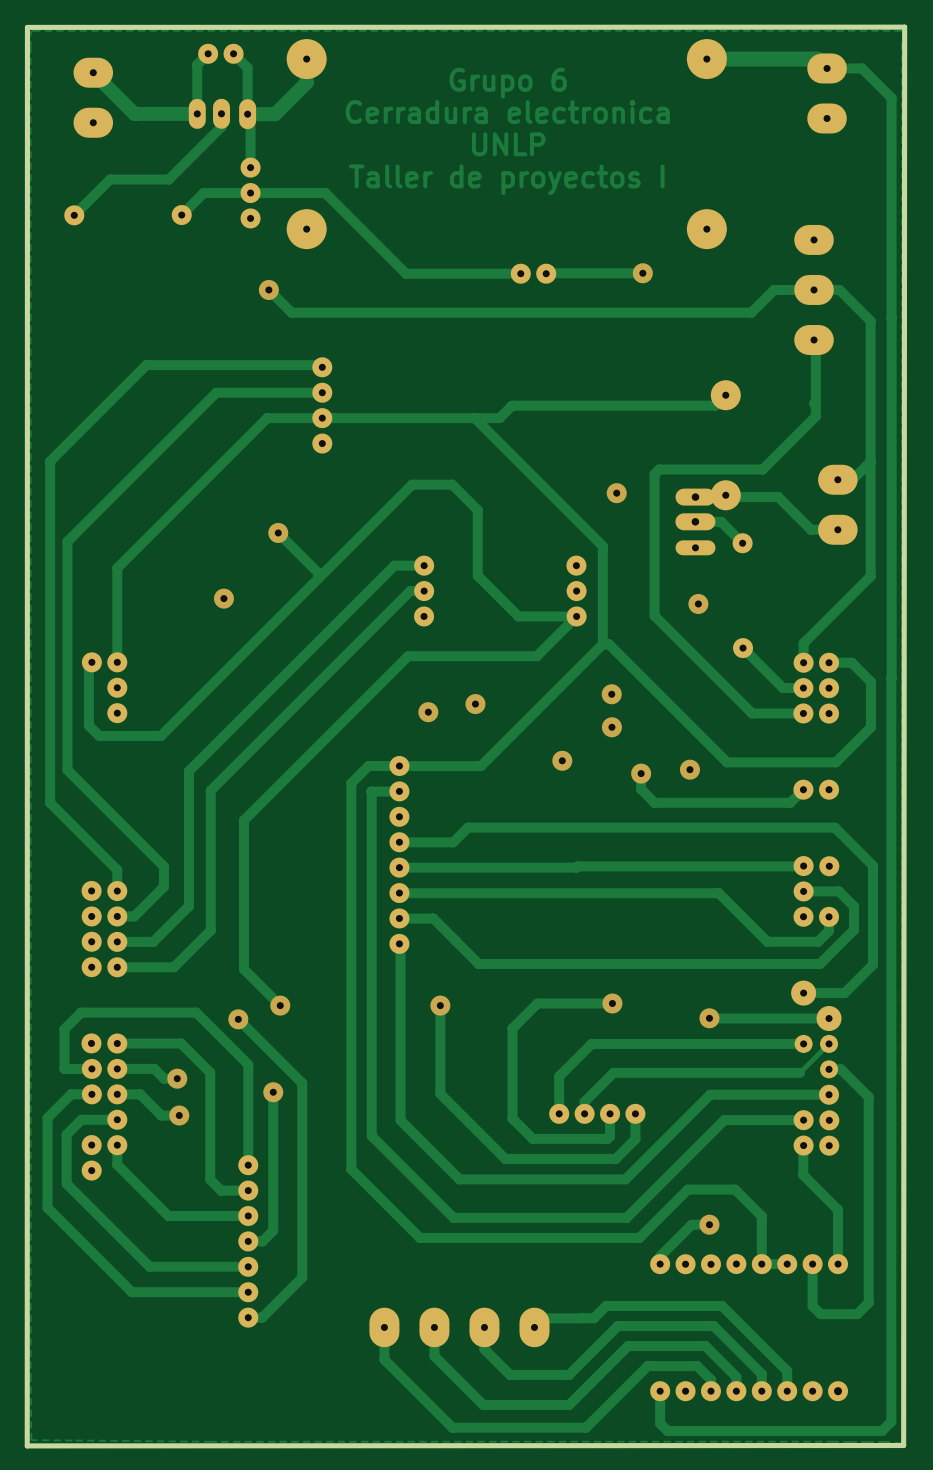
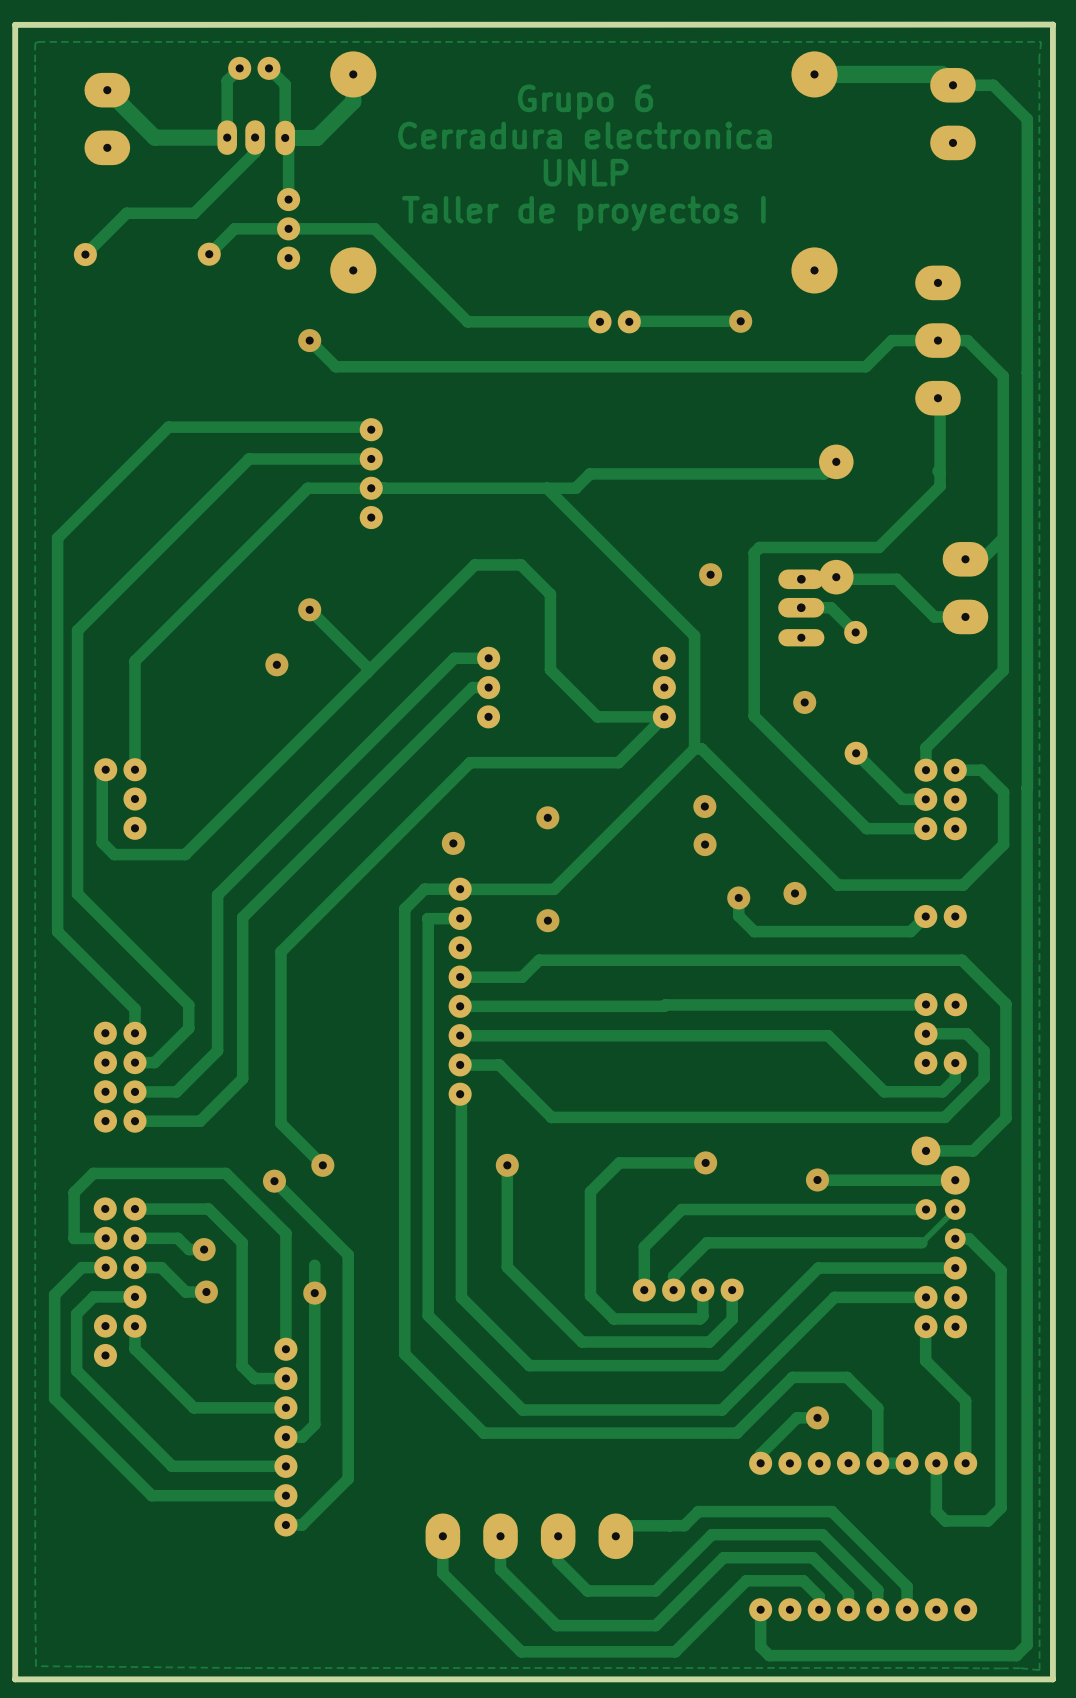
board edge: (904, 27) (903, 1445) (27, 1445) (27, 27) (904, 27) -> (1052, 24) (1052, 1679) (15, 1679) (15, 24) (1052, 24)
via position: (278, 532) -> (309, 609)
via: none -> (276, 664)
via: (223, 598) -> none
via position: (428, 712) -> (453, 843)
via: (562, 760) -> none
via: none -> (547, 920)
via position: (273, 1092) -> (314, 1293)

